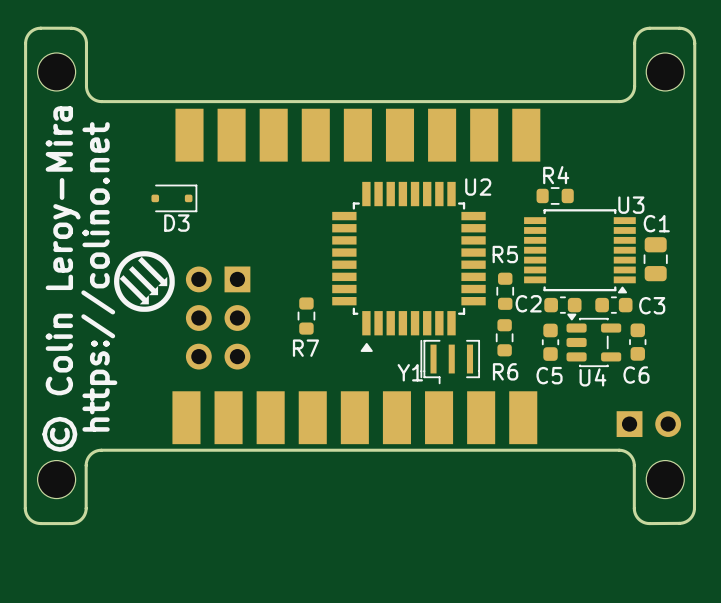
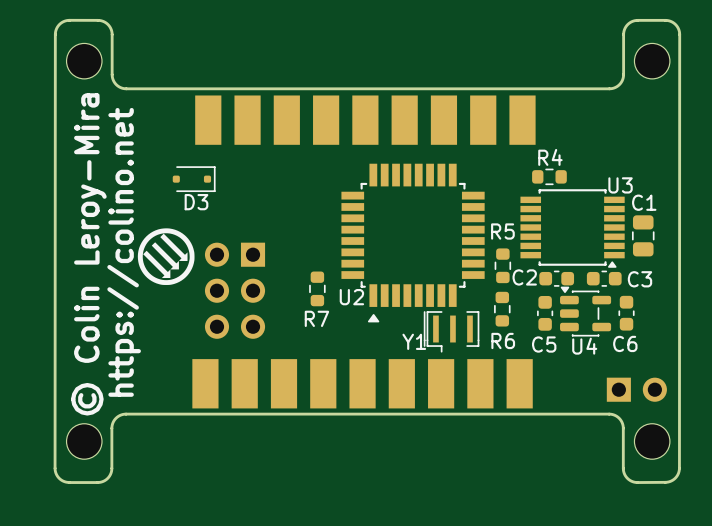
U2 name position: U2 (478, 187) -> U2 (351, 297)

